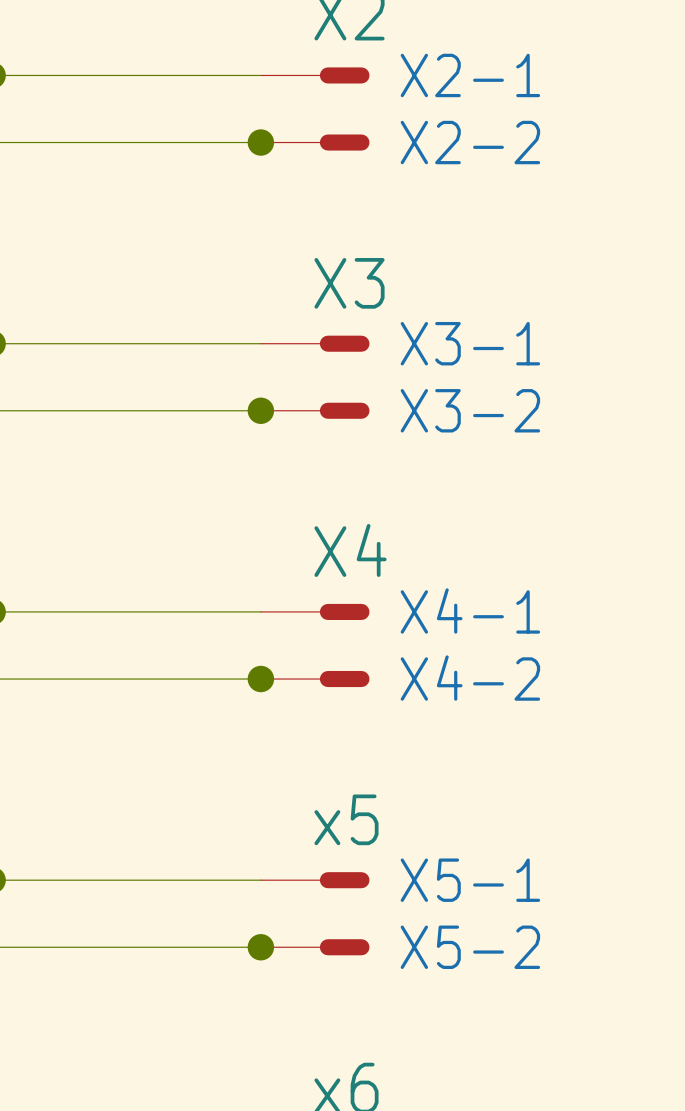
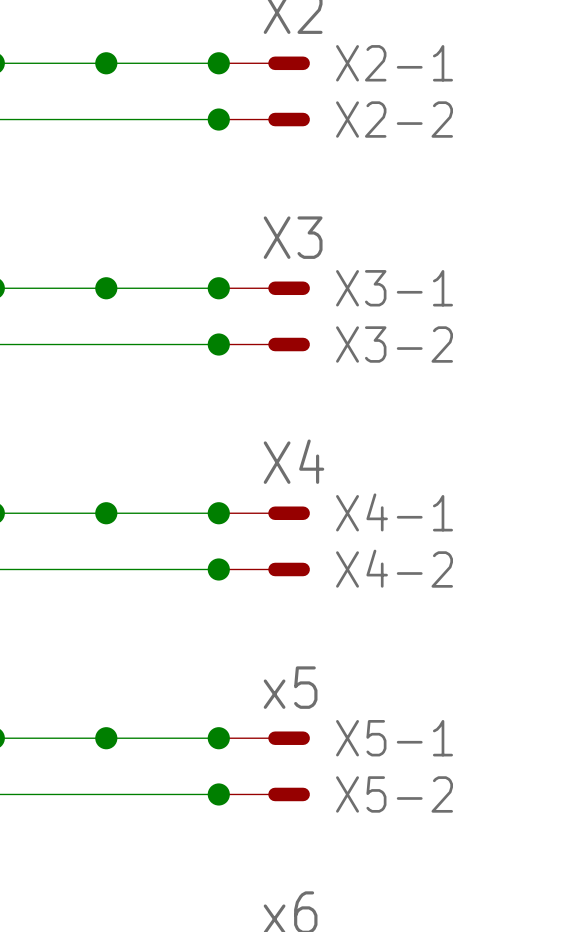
junction: none -> (106, 63)
junction: none -> (218, 63)
junction: none -> (106, 288)
junction: none -> (218, 288)
junction: none -> (106, 513)
junction: none -> (218, 513)
junction: none -> (106, 738)
junction: none -> (218, 738)

